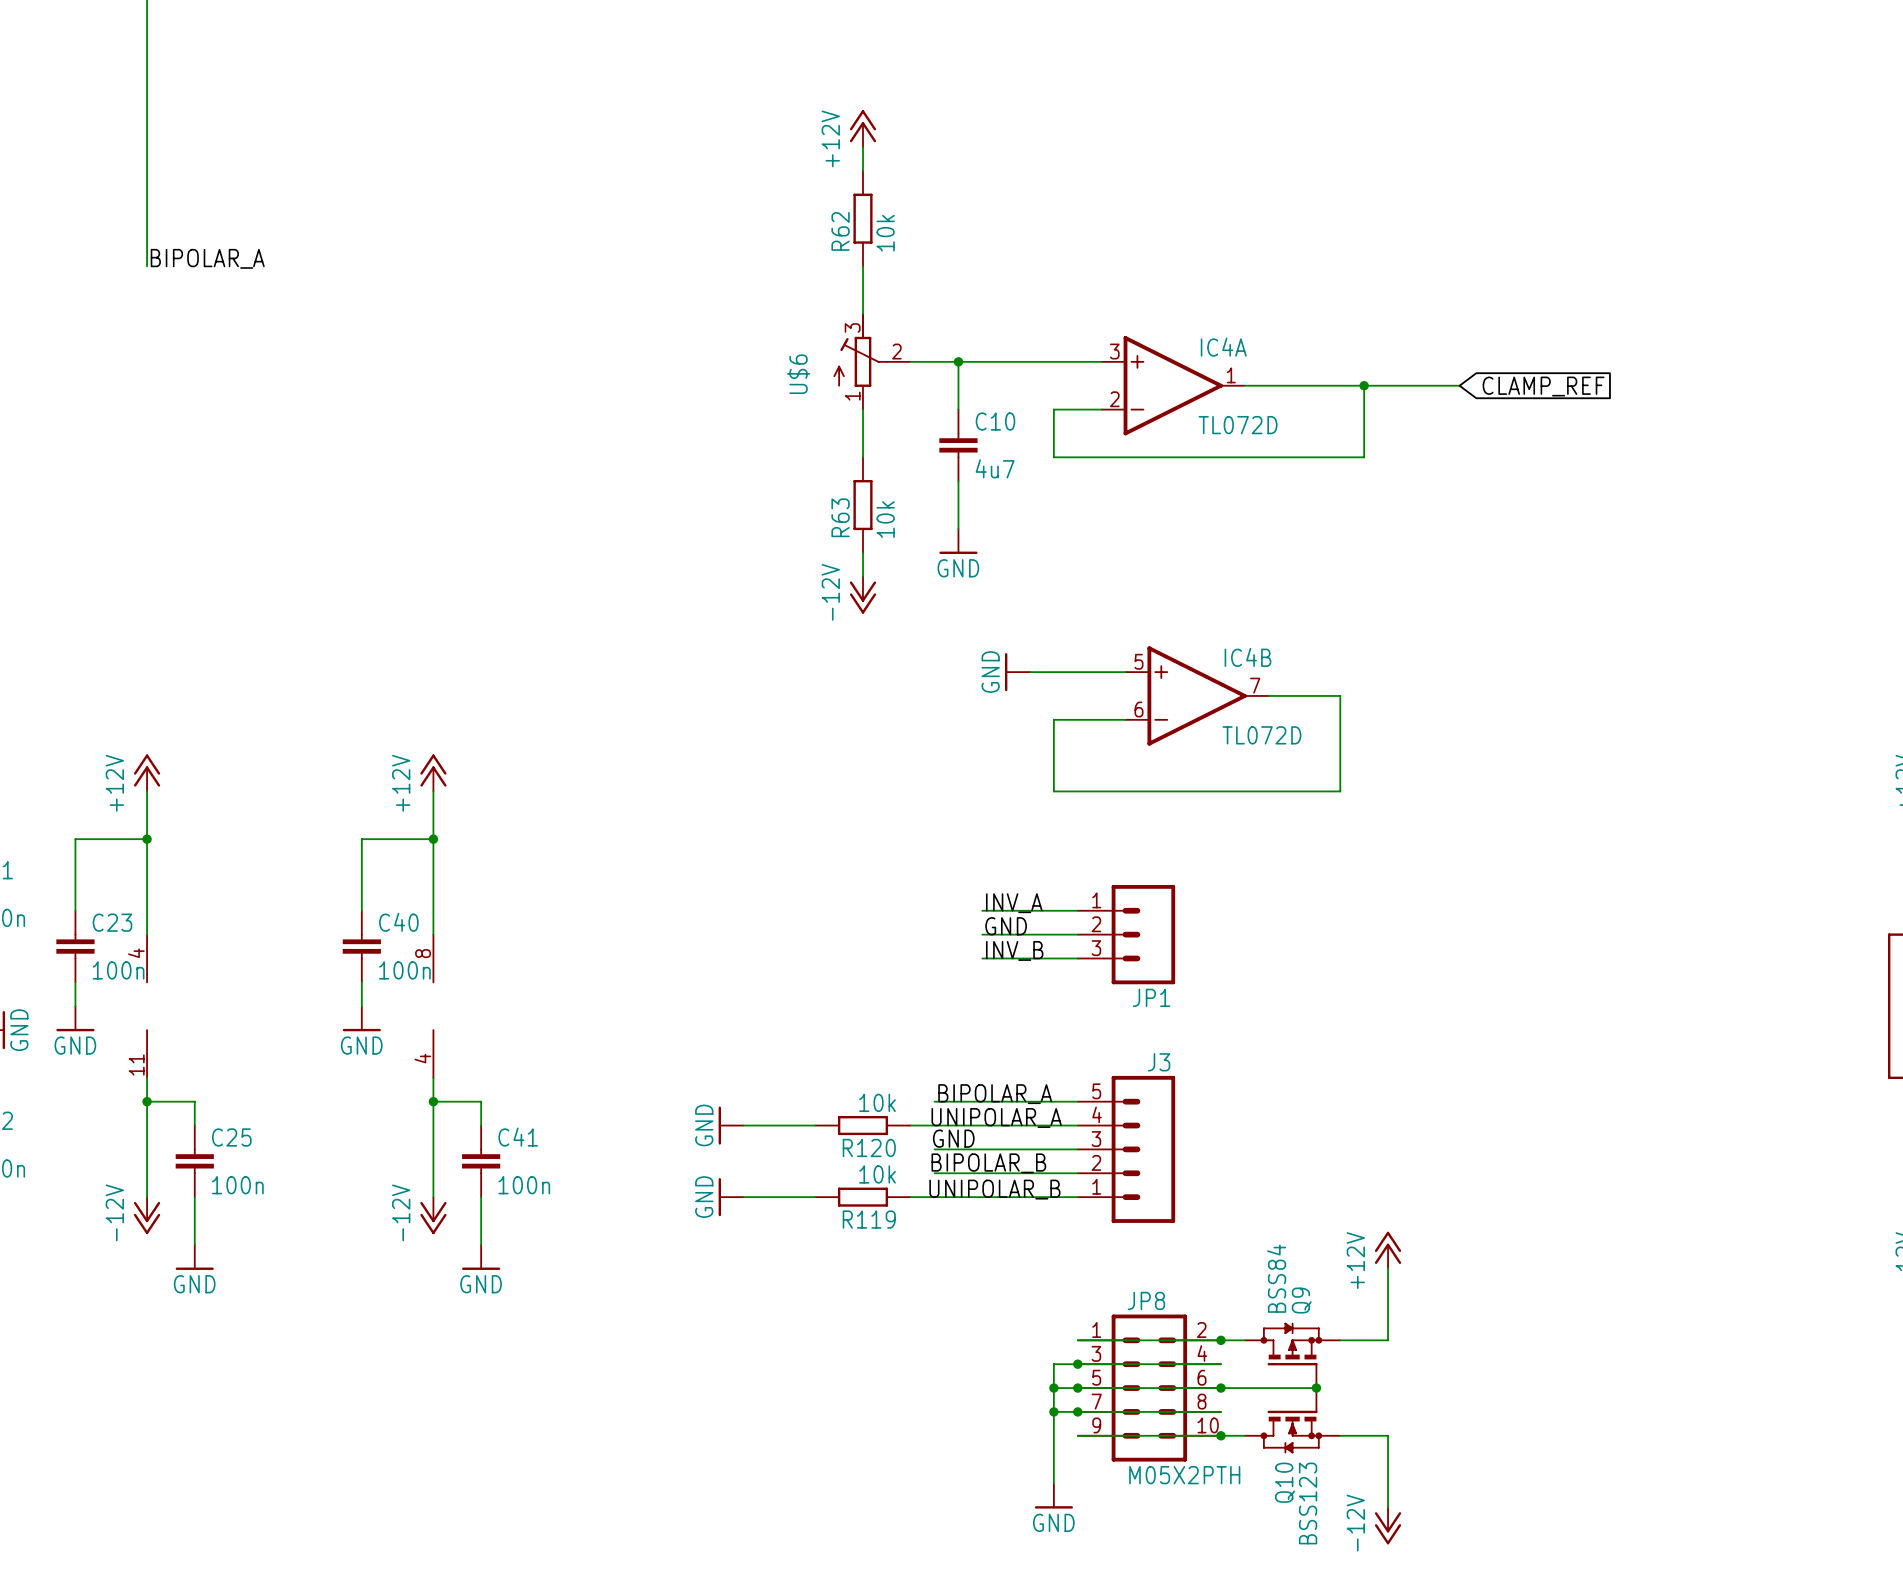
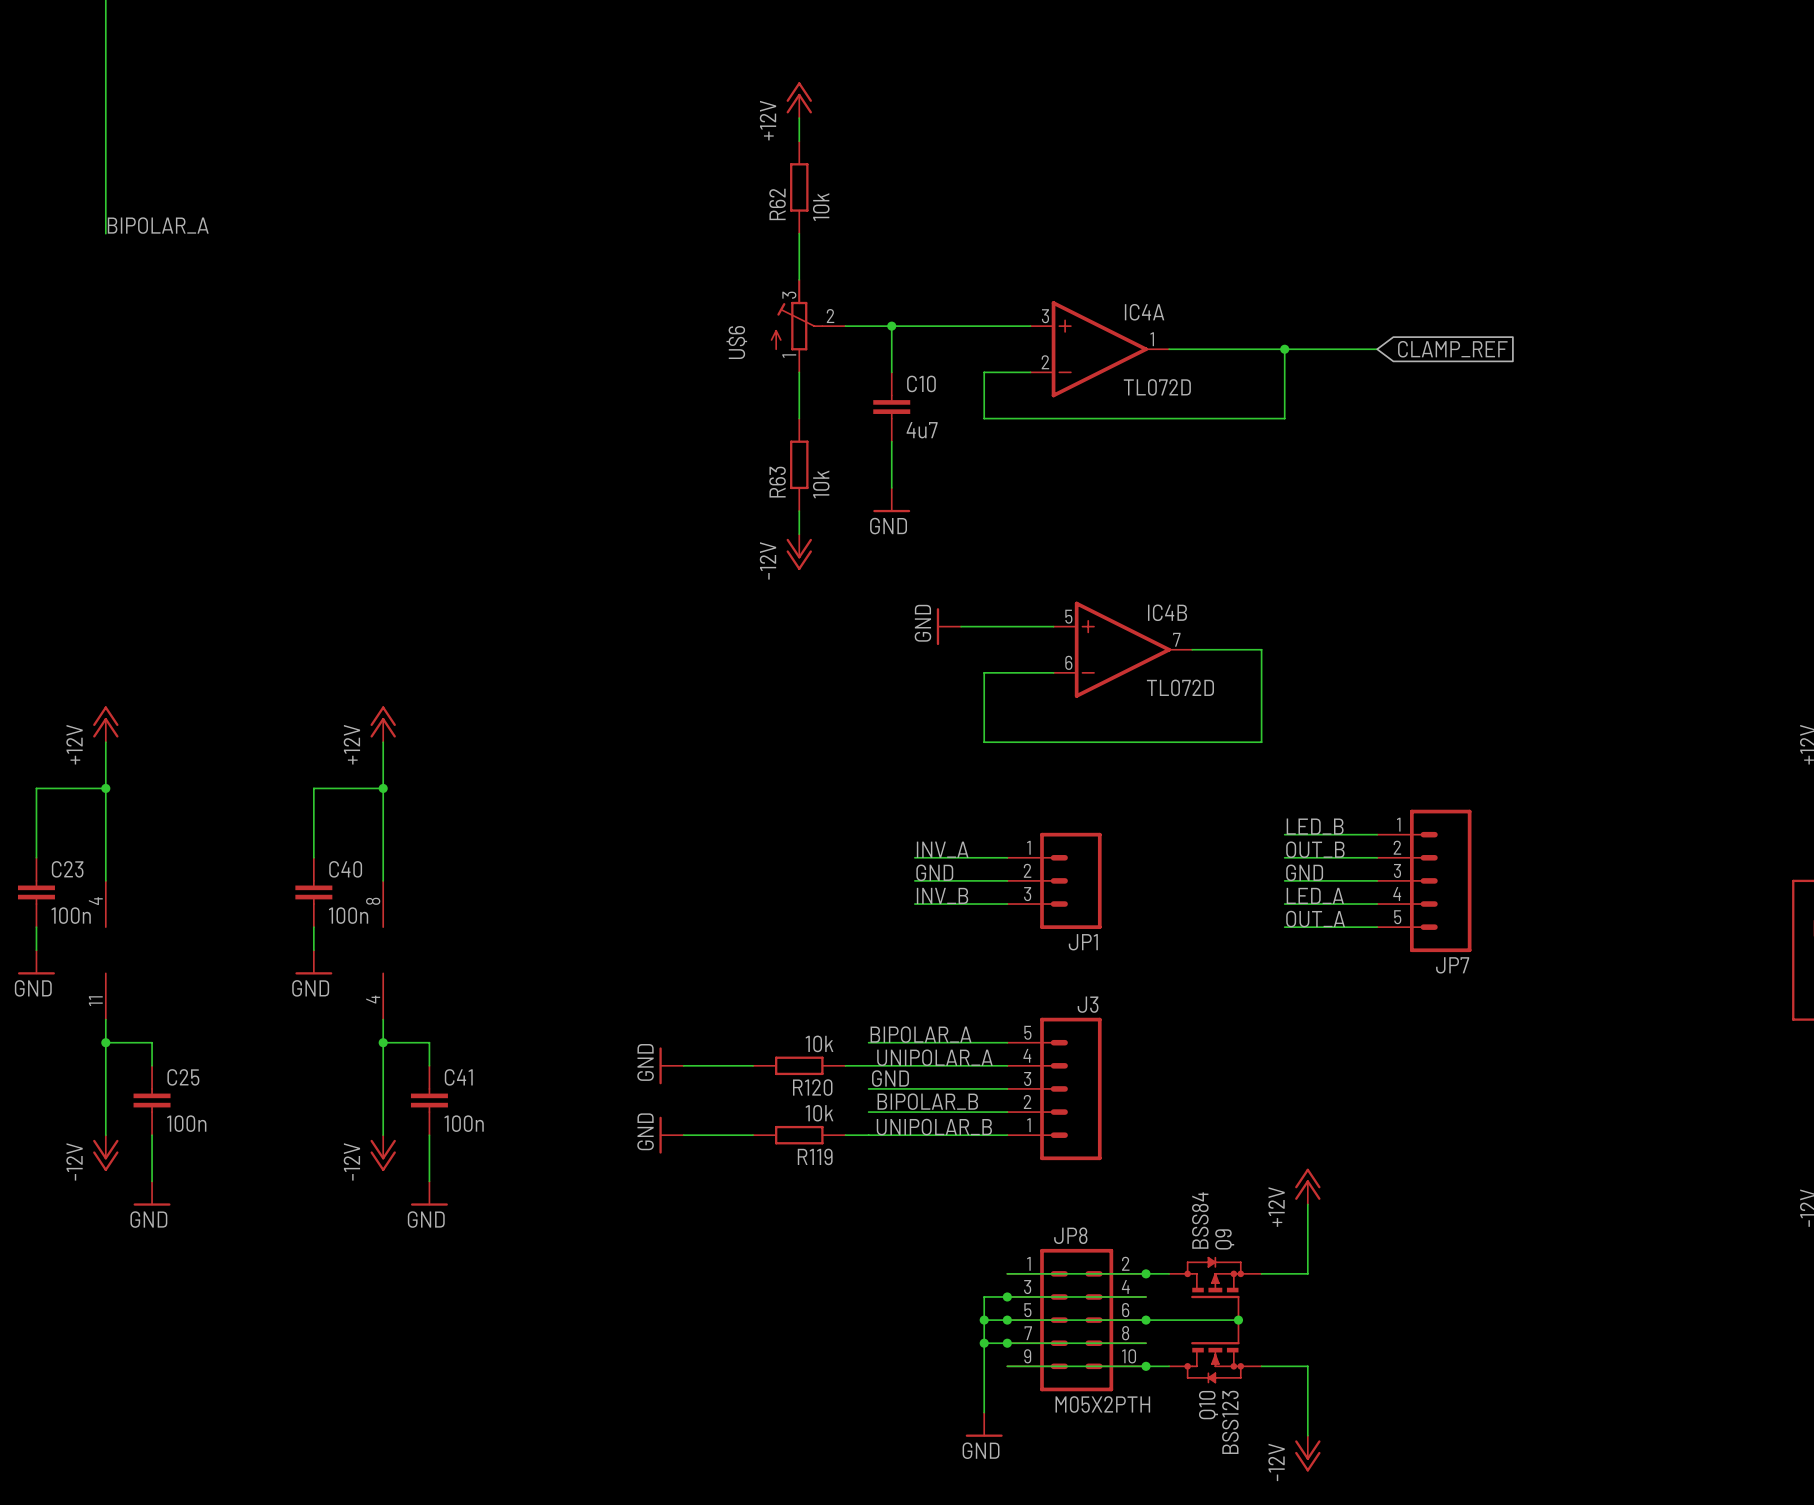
label: none -> LED_B (1315, 826)
wire: none -> (1284, 834) (1377, 834)
label: none -> OUT_B (1315, 849)
wire: none -> (1284, 857) (1377, 857)
label: none -> GND (1304, 872)
wire: none -> (1284, 880) (1377, 880)
JP7: none -> (1424, 880)
label: none -> LED_A (1315, 895)
wire: none -> (1284, 904) (1377, 904)
label: none -> OUT_A (1315, 919)
wire: none -> (1284, 927) (1377, 927)

